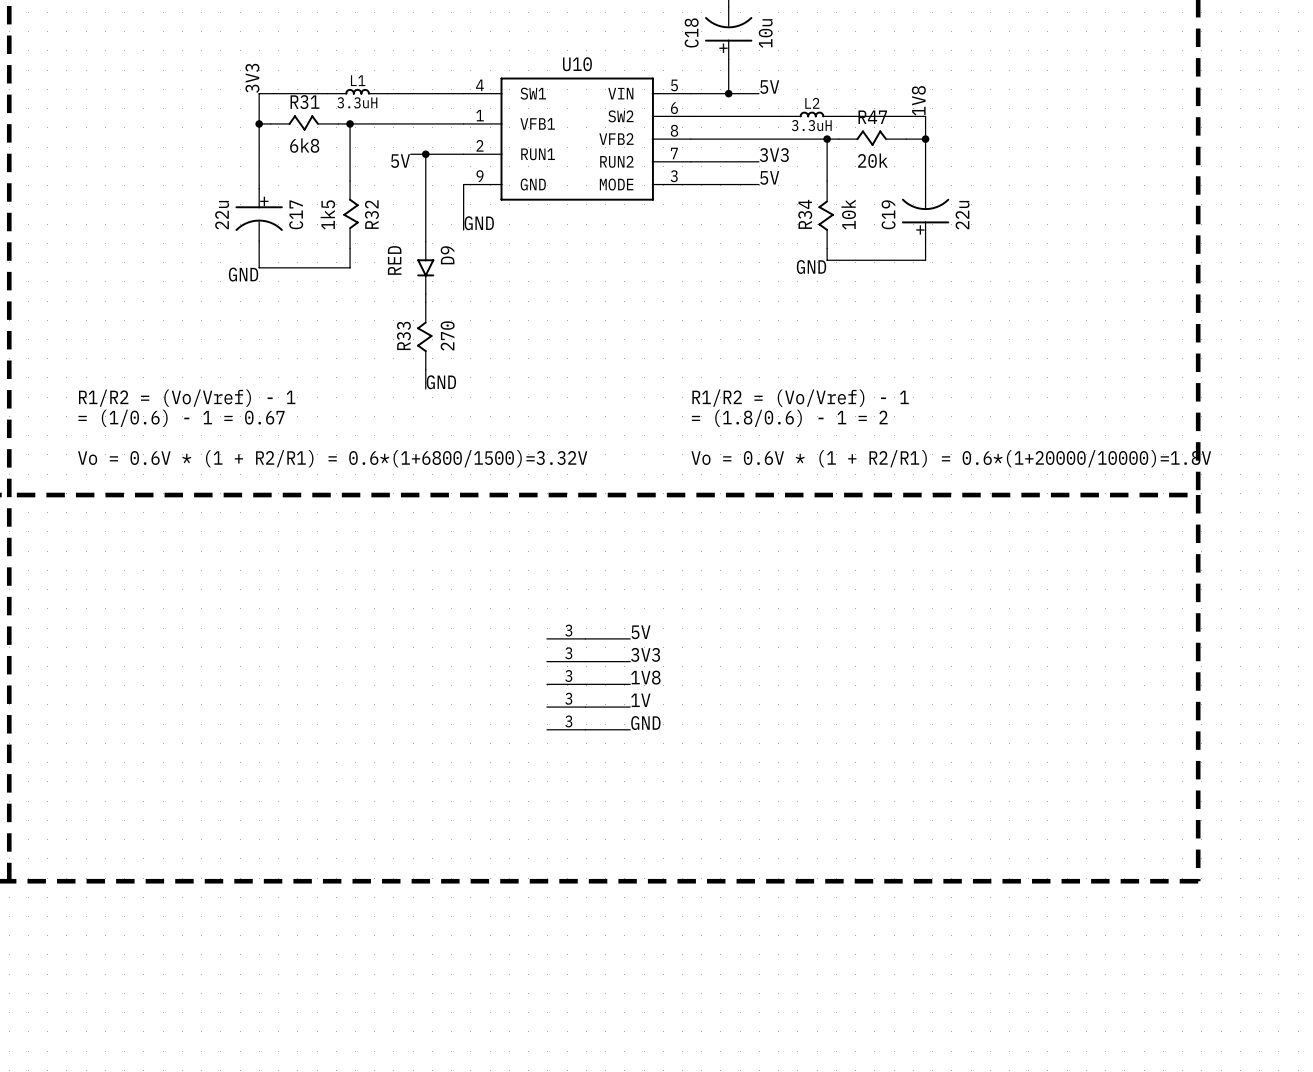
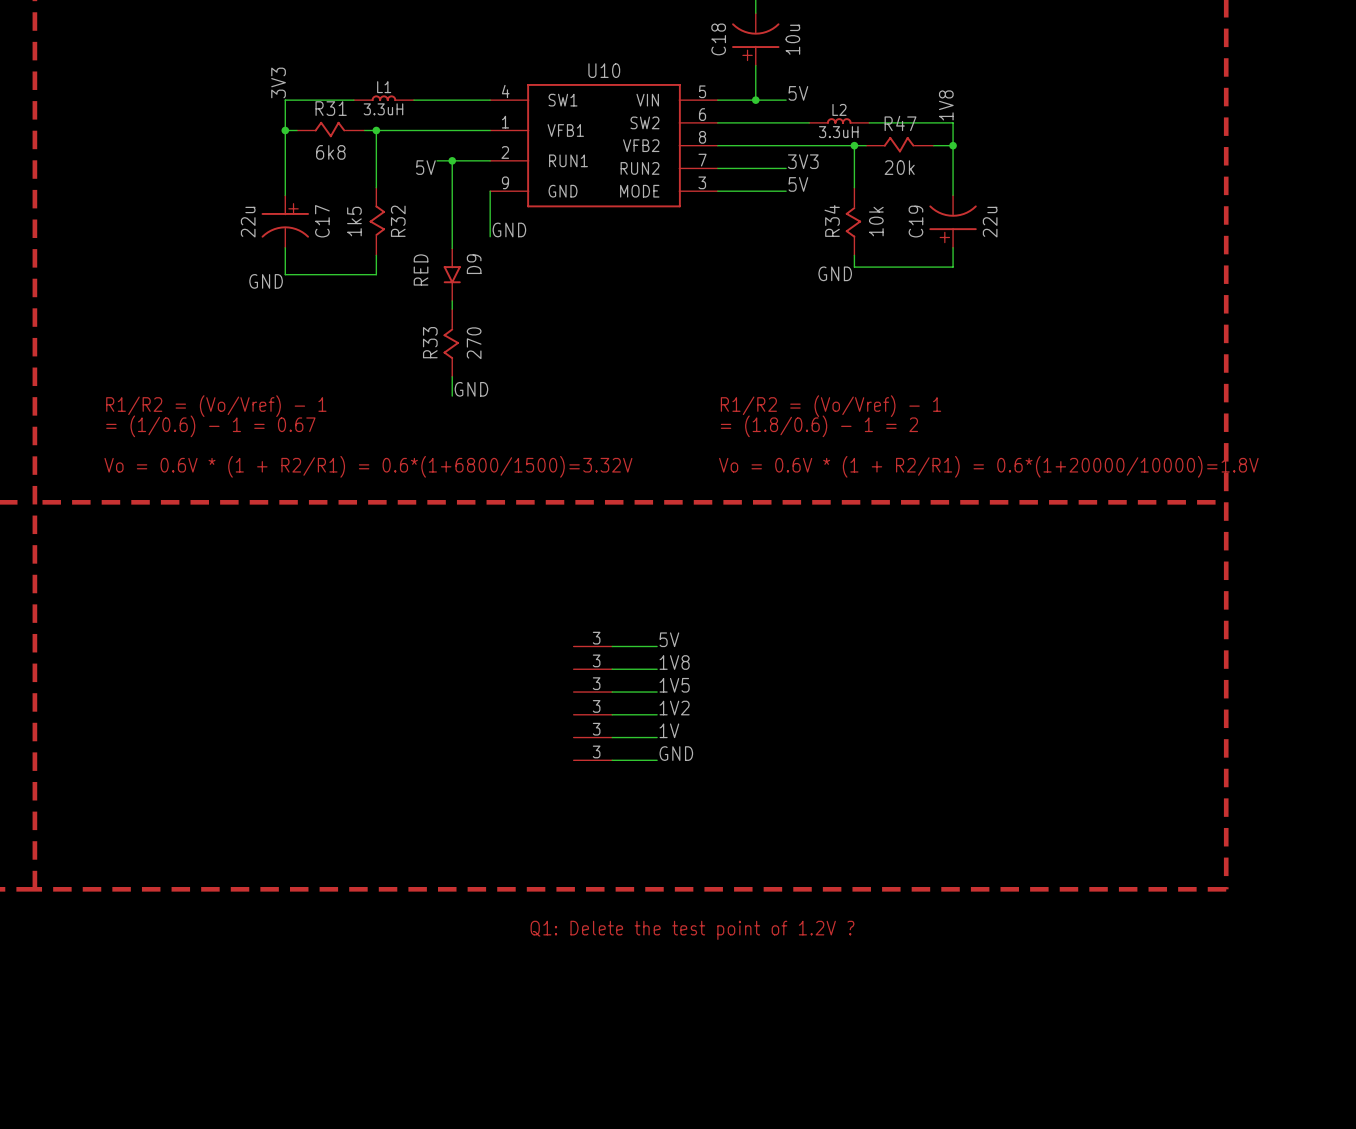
label: 3V3 (645, 654) -> 1V8 (674, 662)
label: 1V8 (645, 677) -> 1V5 (674, 685)
label: 1V (640, 700) -> 1V2 (674, 708)
label: GND (645, 723) -> 1V (669, 730)
label: none -> GND (676, 753)
part: none -> (592, 760)
wire: none -> (612, 760) (657, 760)
text: none -> Q1: Delete the test point of 1.2V ? (692, 930)

